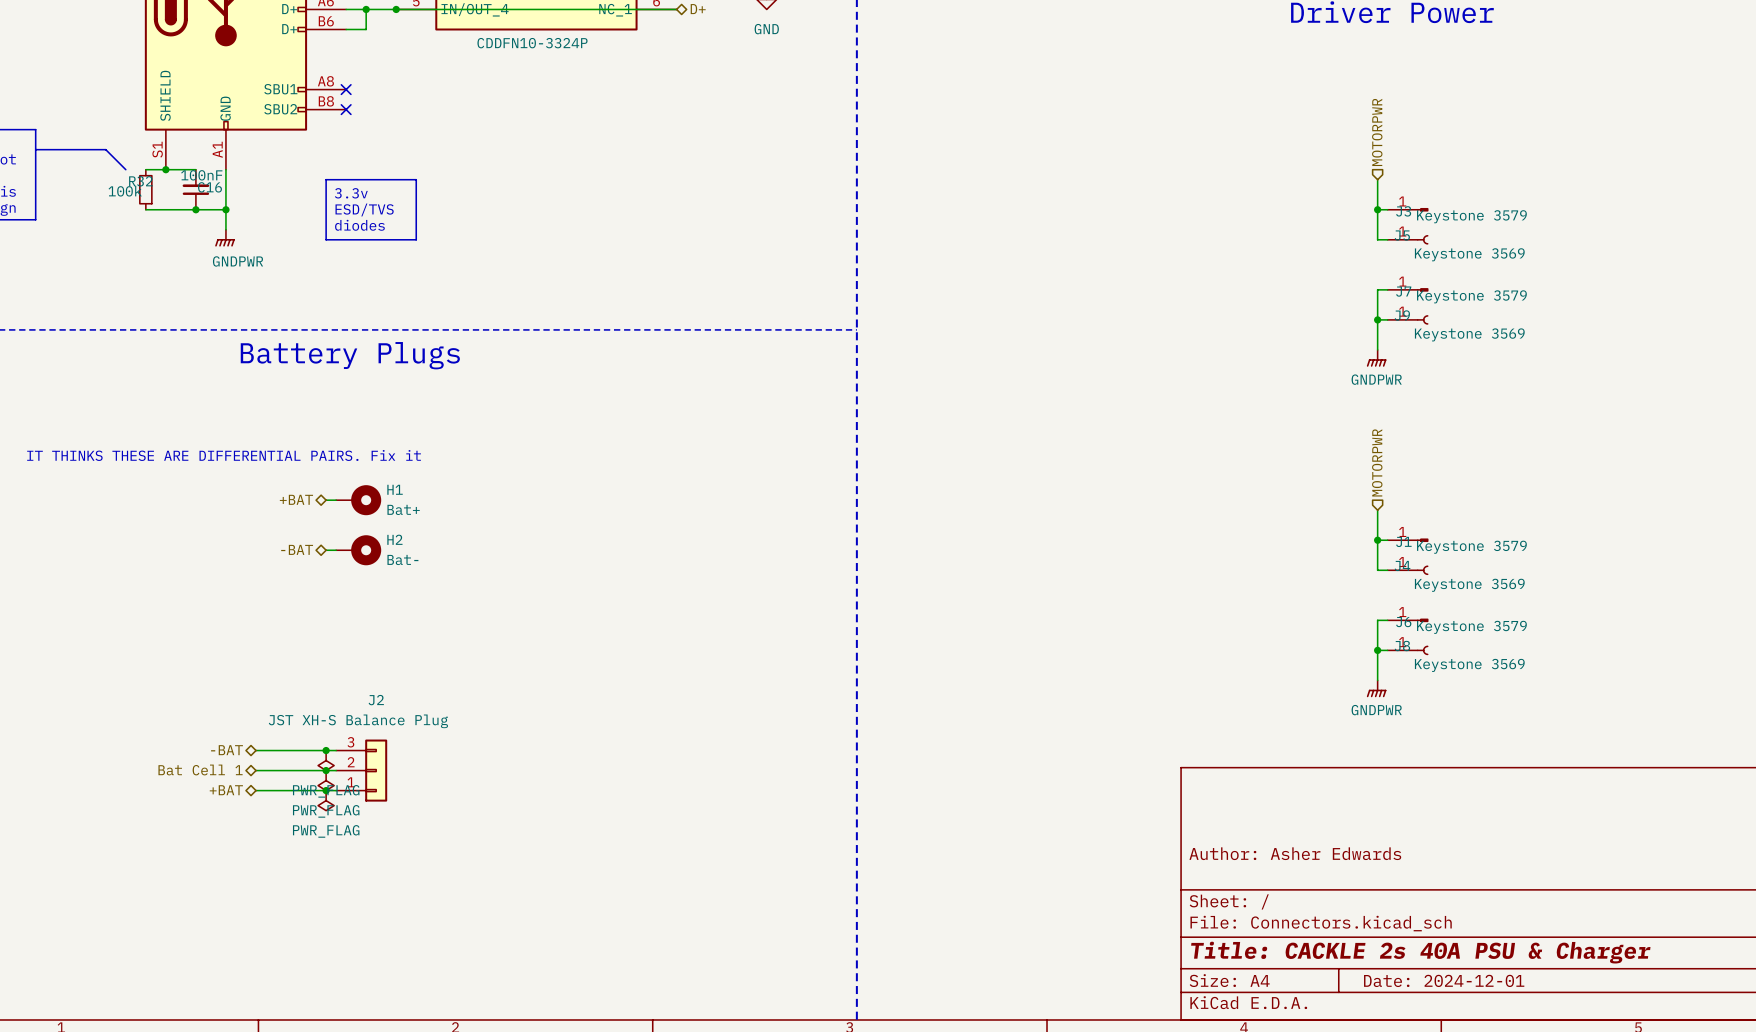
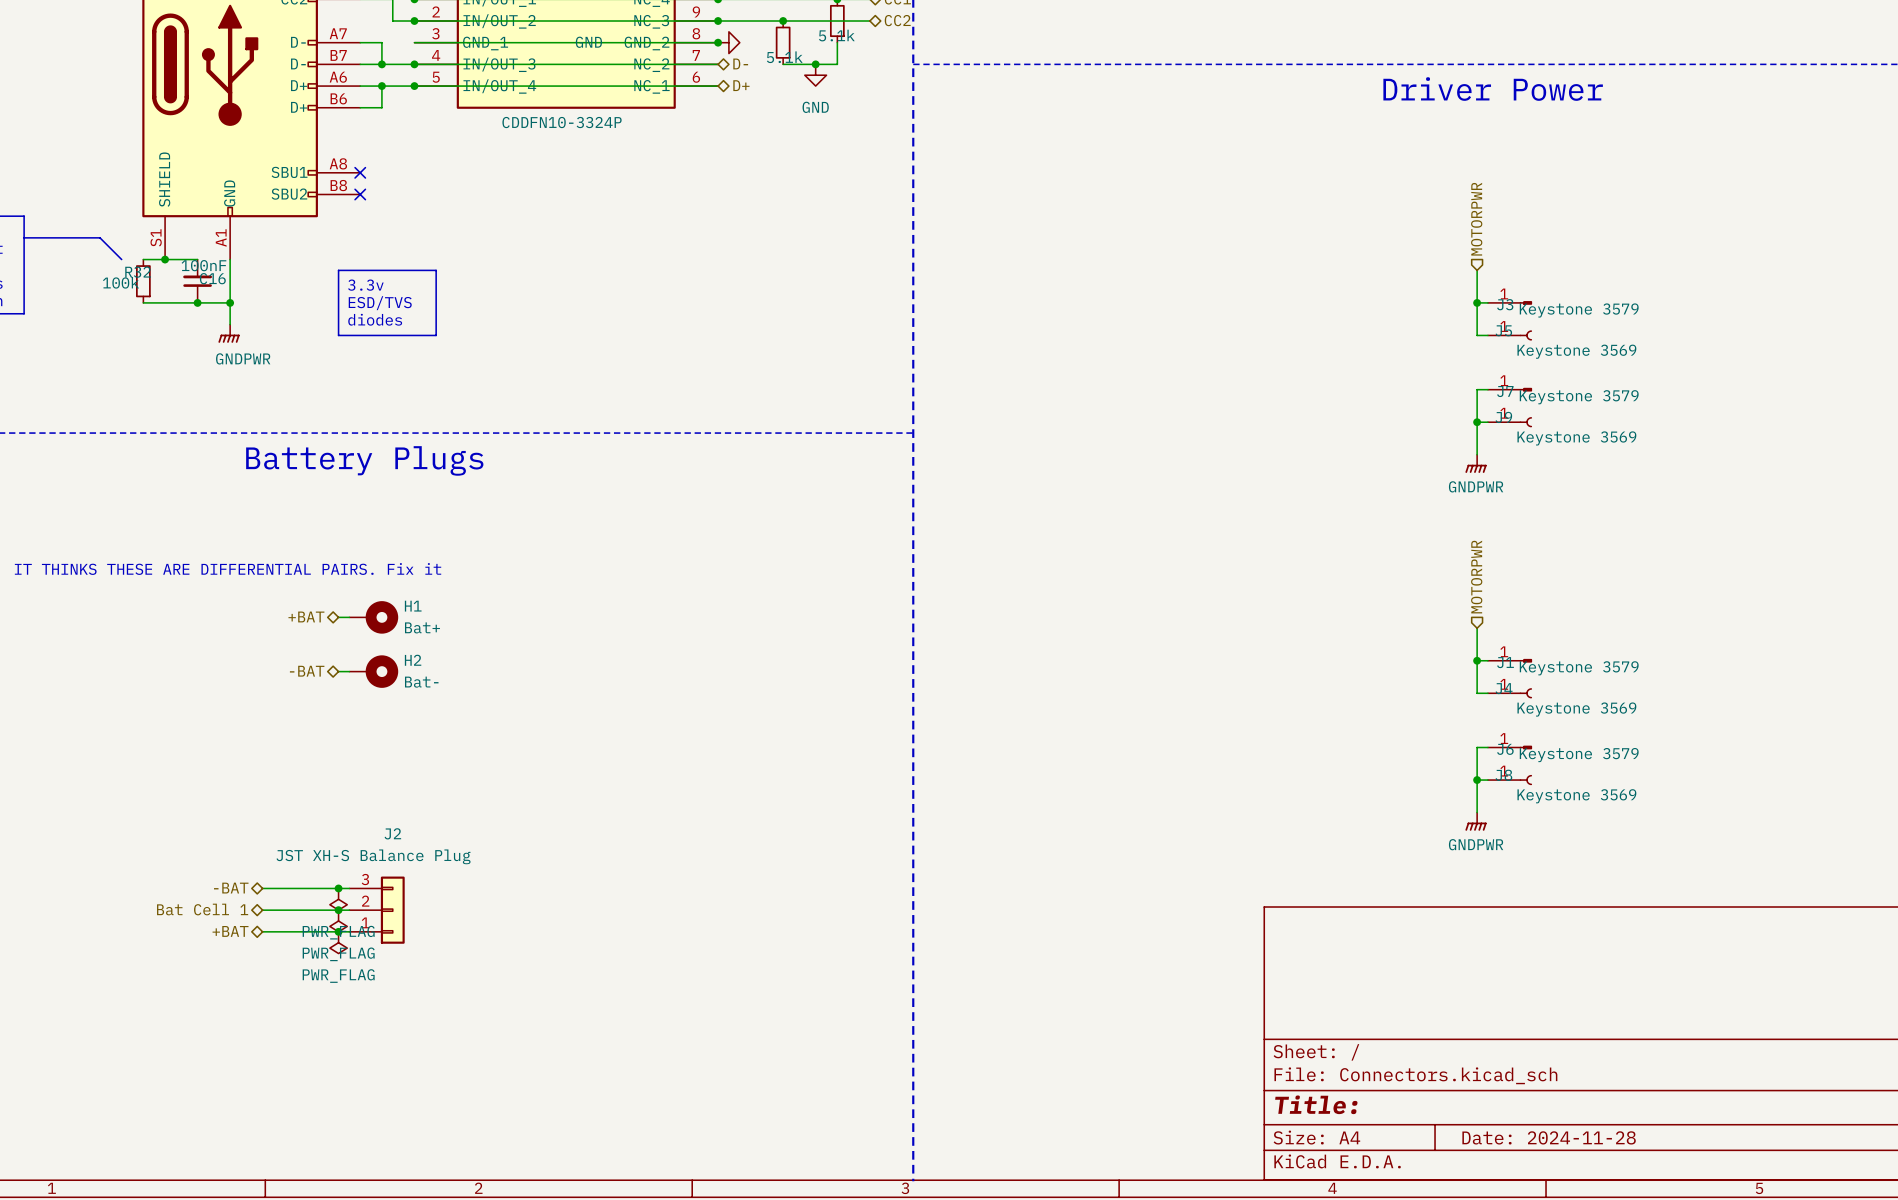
title block: Author: Asher Edwards (1295, 853) -> none
title block: Title: CACKLE 2s 40A PSU & Charger (1420, 952) -> Title: (1316, 1104)
title block: Date: 2024-12-01 (1444, 980) -> Date: 2024-11-28 (1549, 1137)

